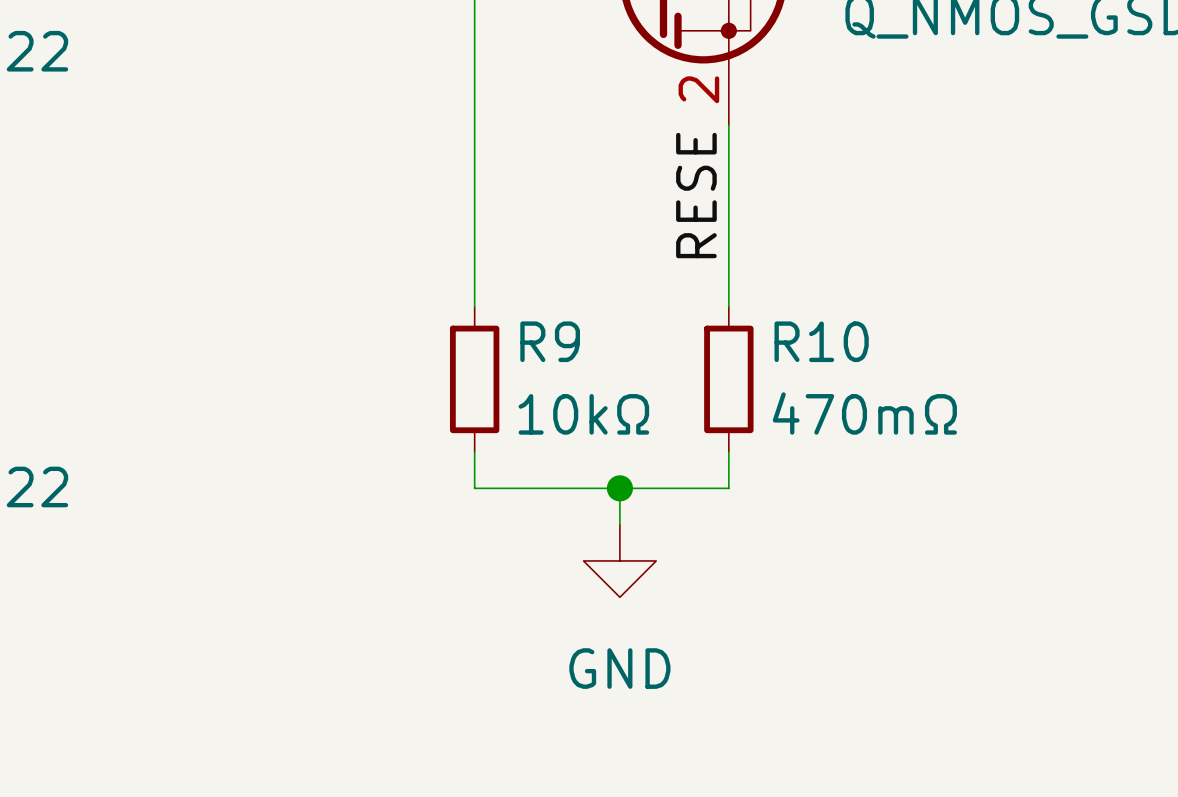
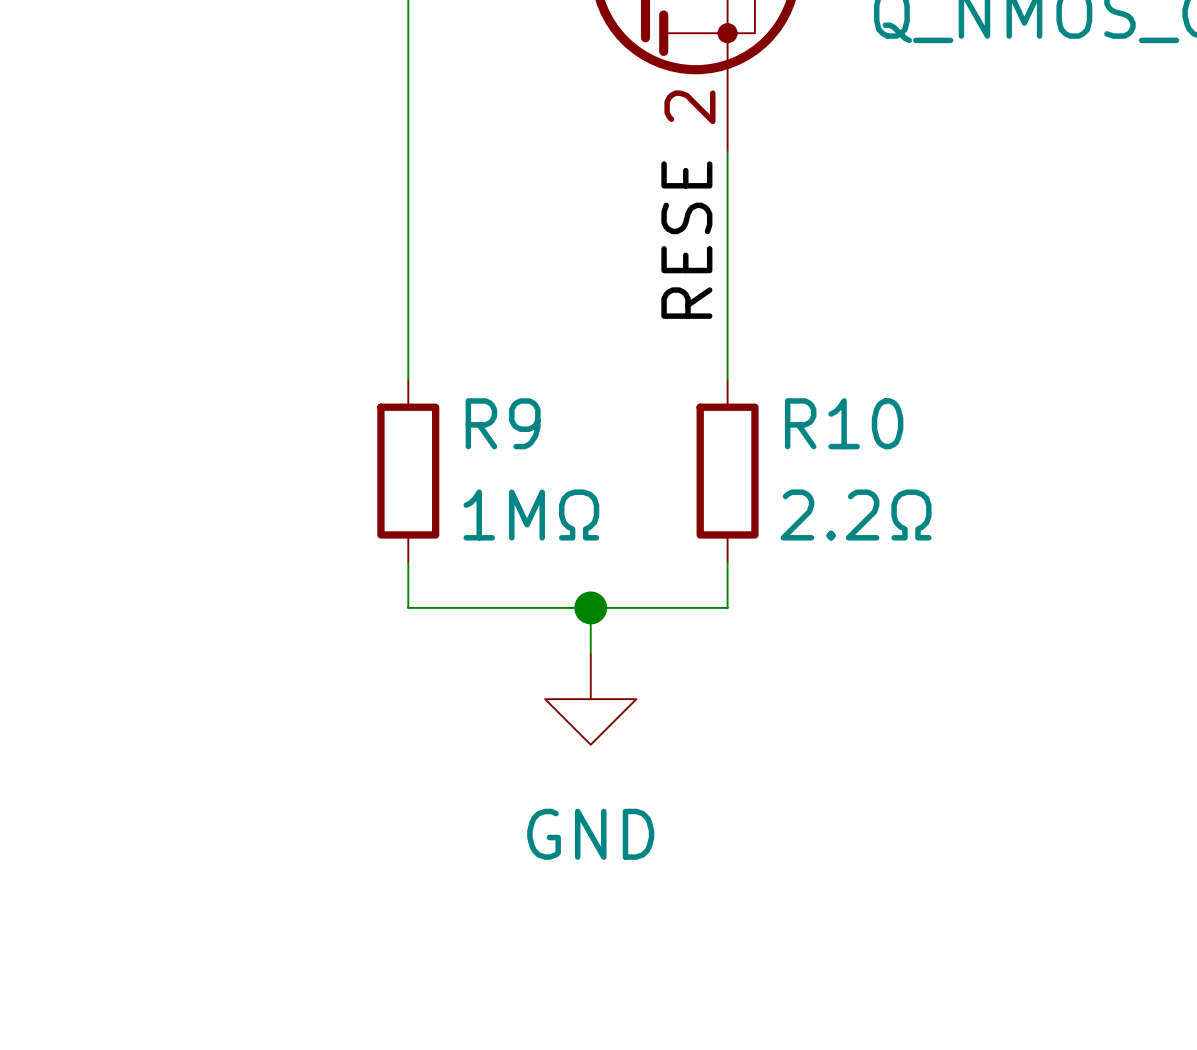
R10 value: 470mΩ (864, 413) -> 2.2Ω (856, 514)
R9 value: 10kΩ (583, 414) -> 1MΩ (531, 514)

